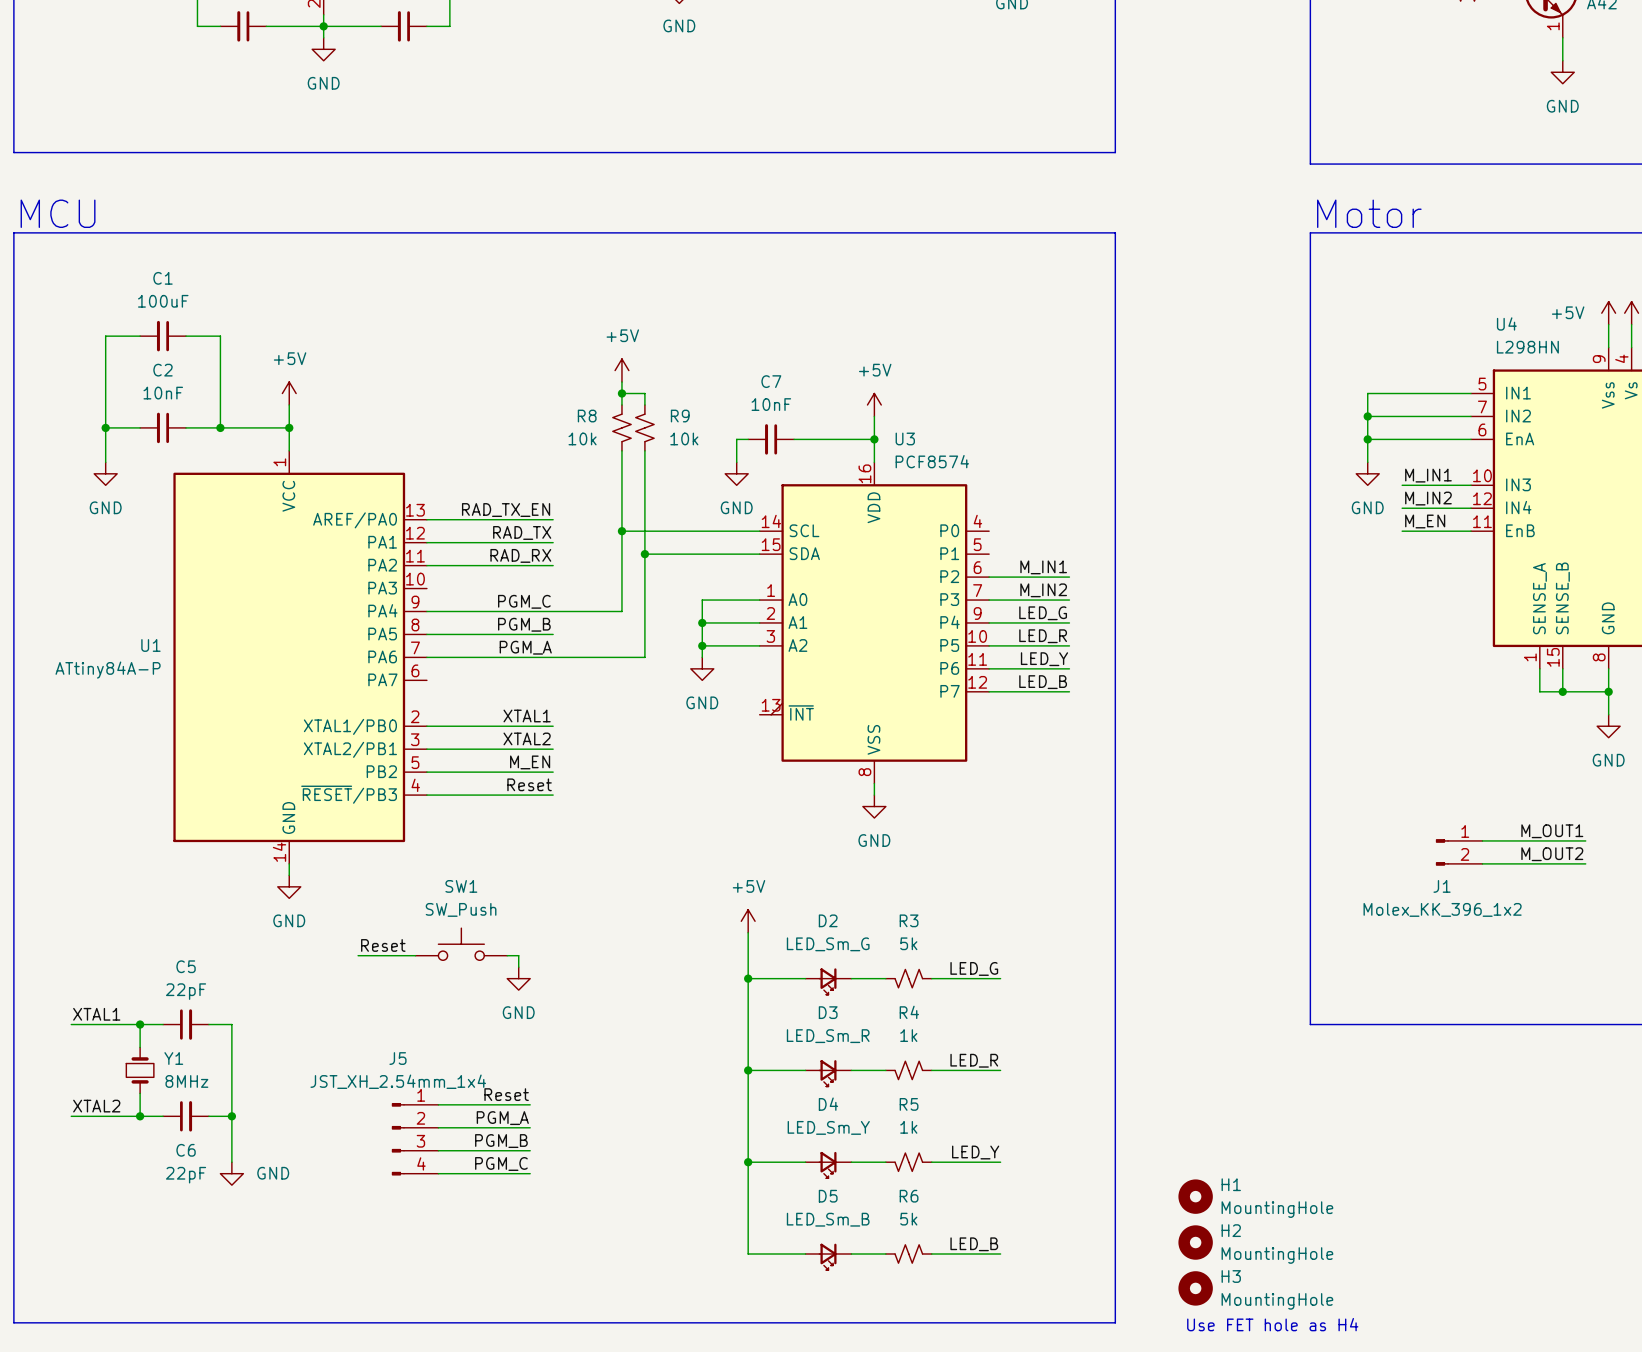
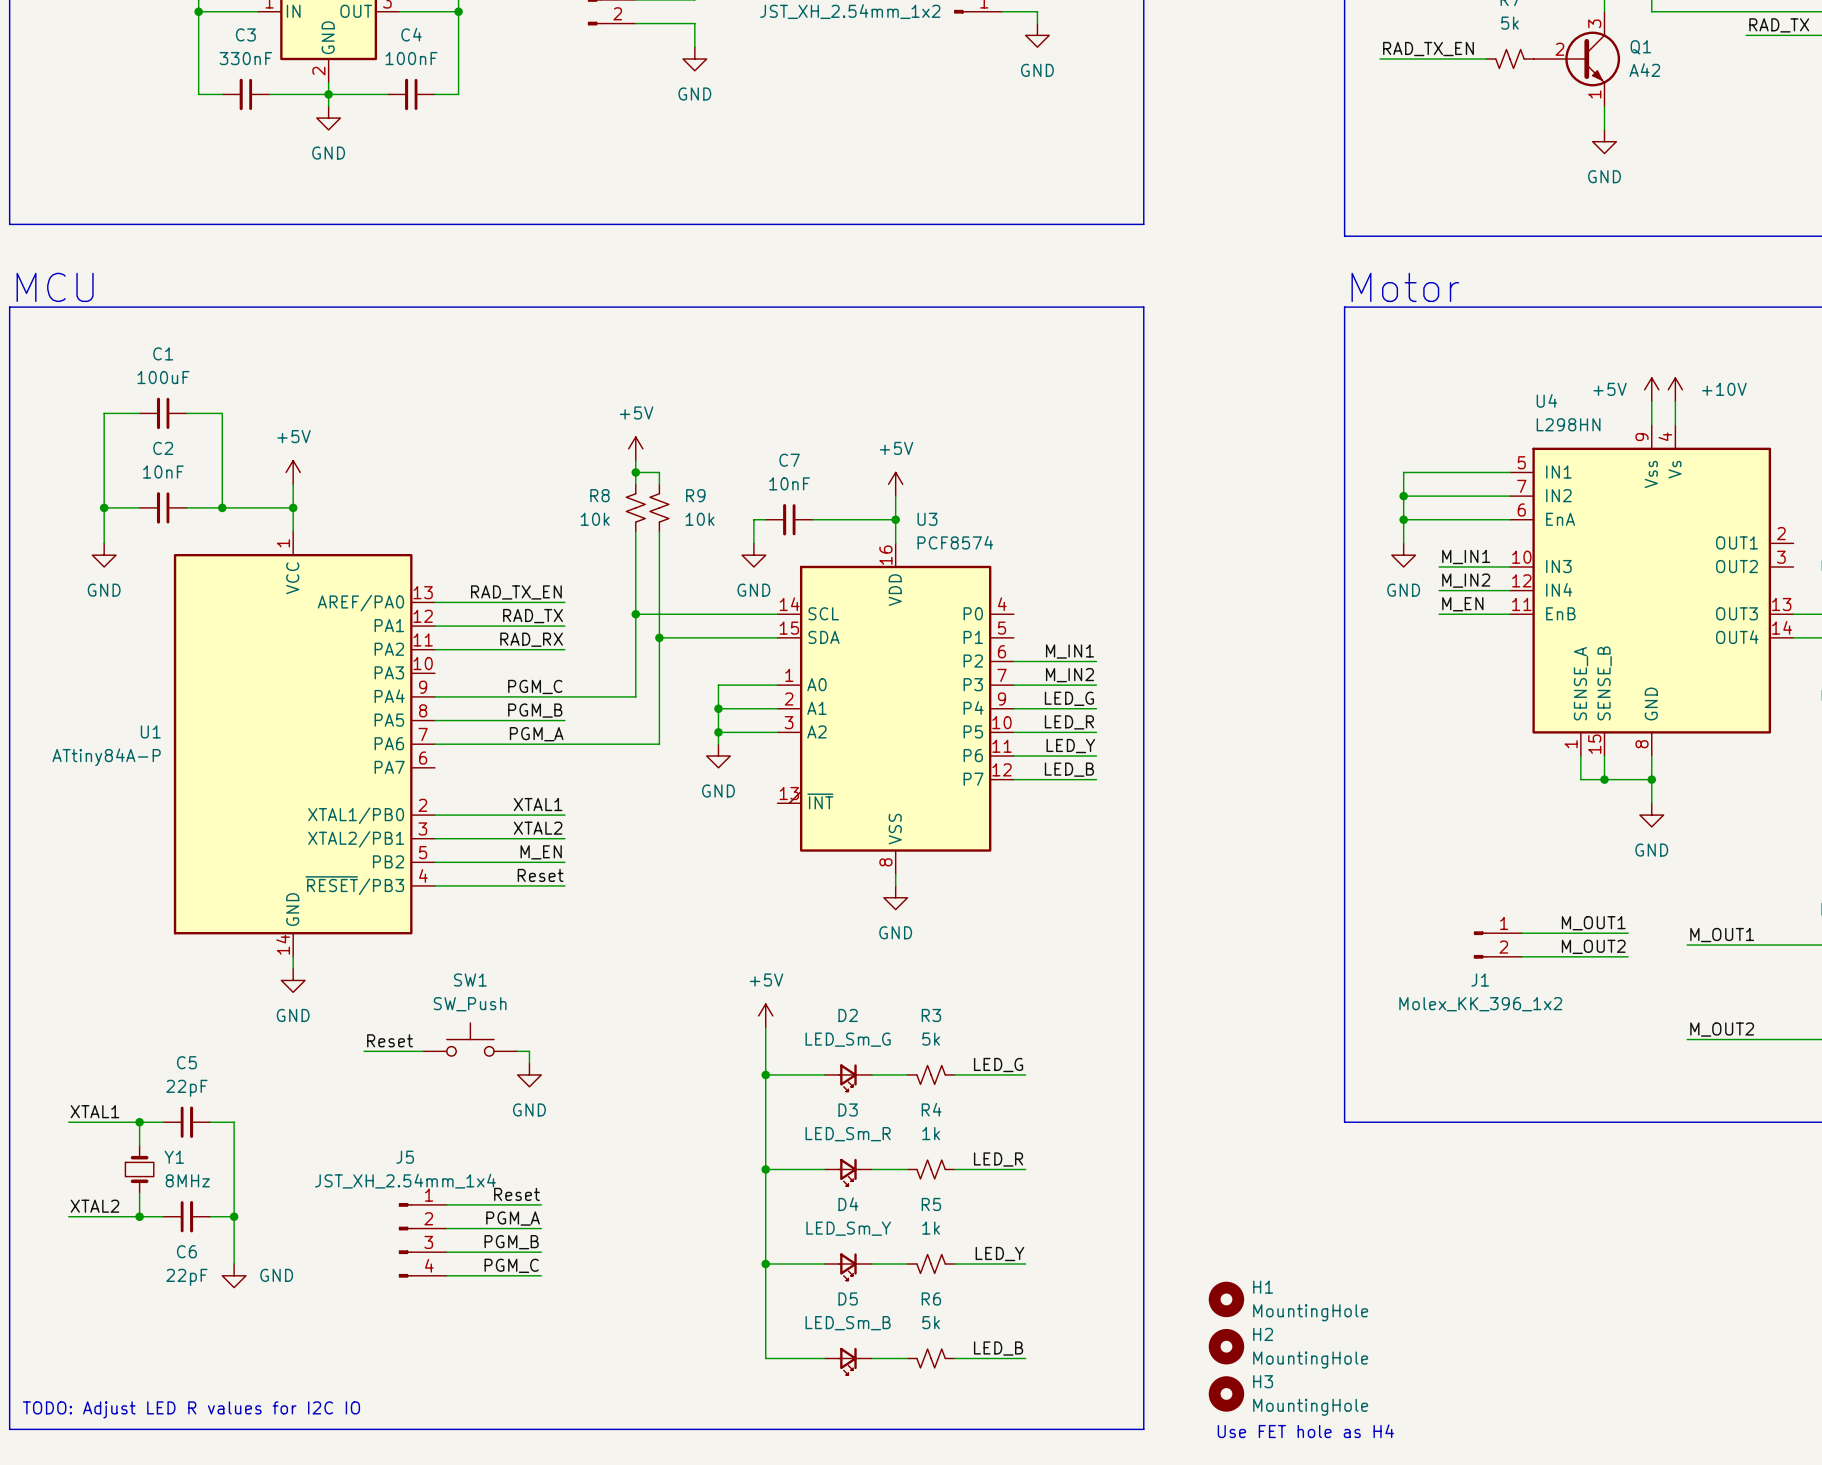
text: none -> TODO: Adjust LED R values for I2C IO (191, 1409)

